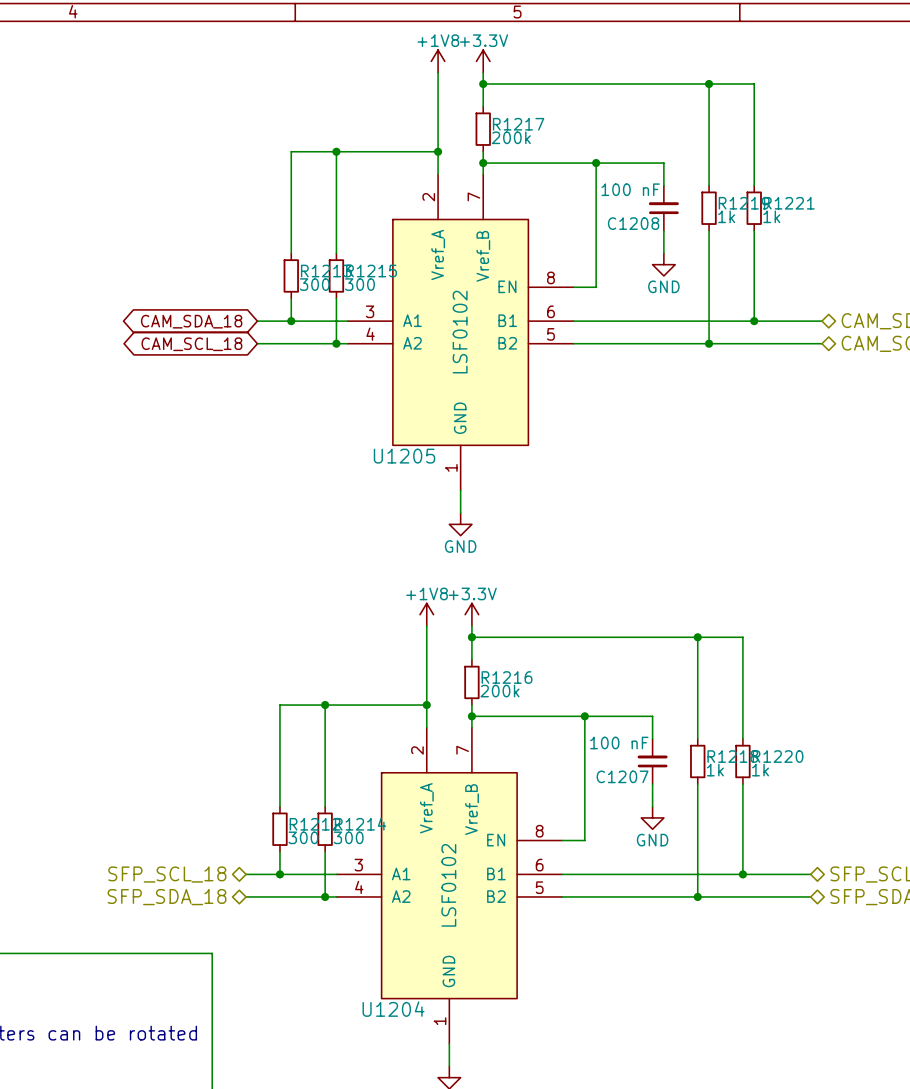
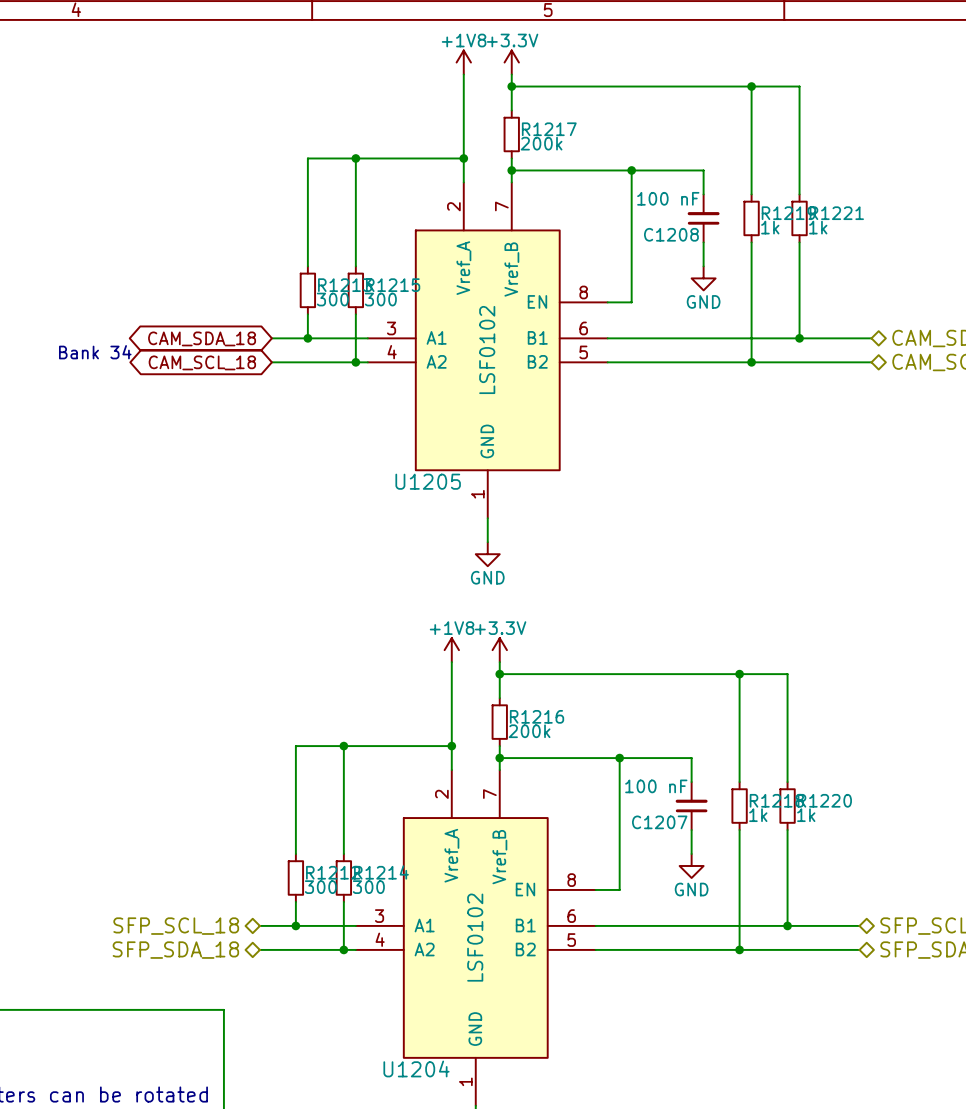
text: none -> Bank 34 (95, 352)

